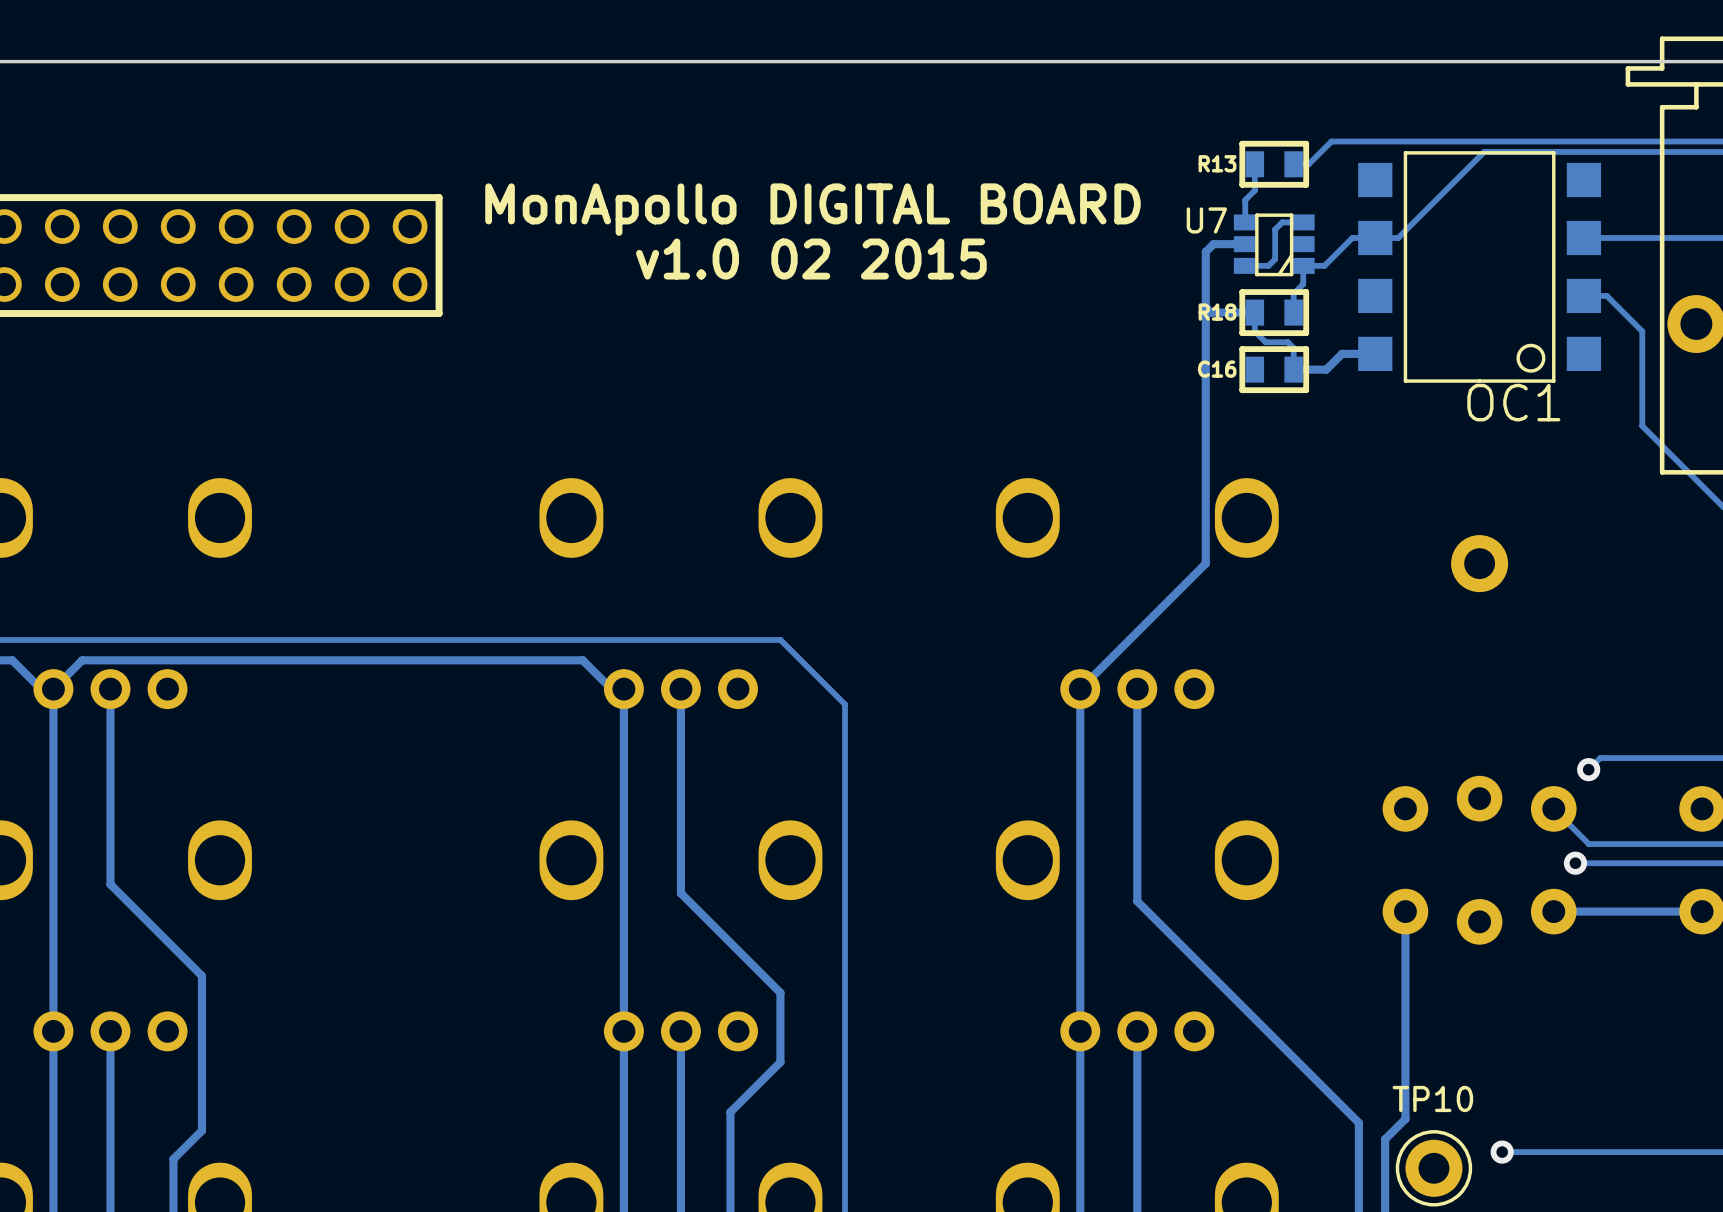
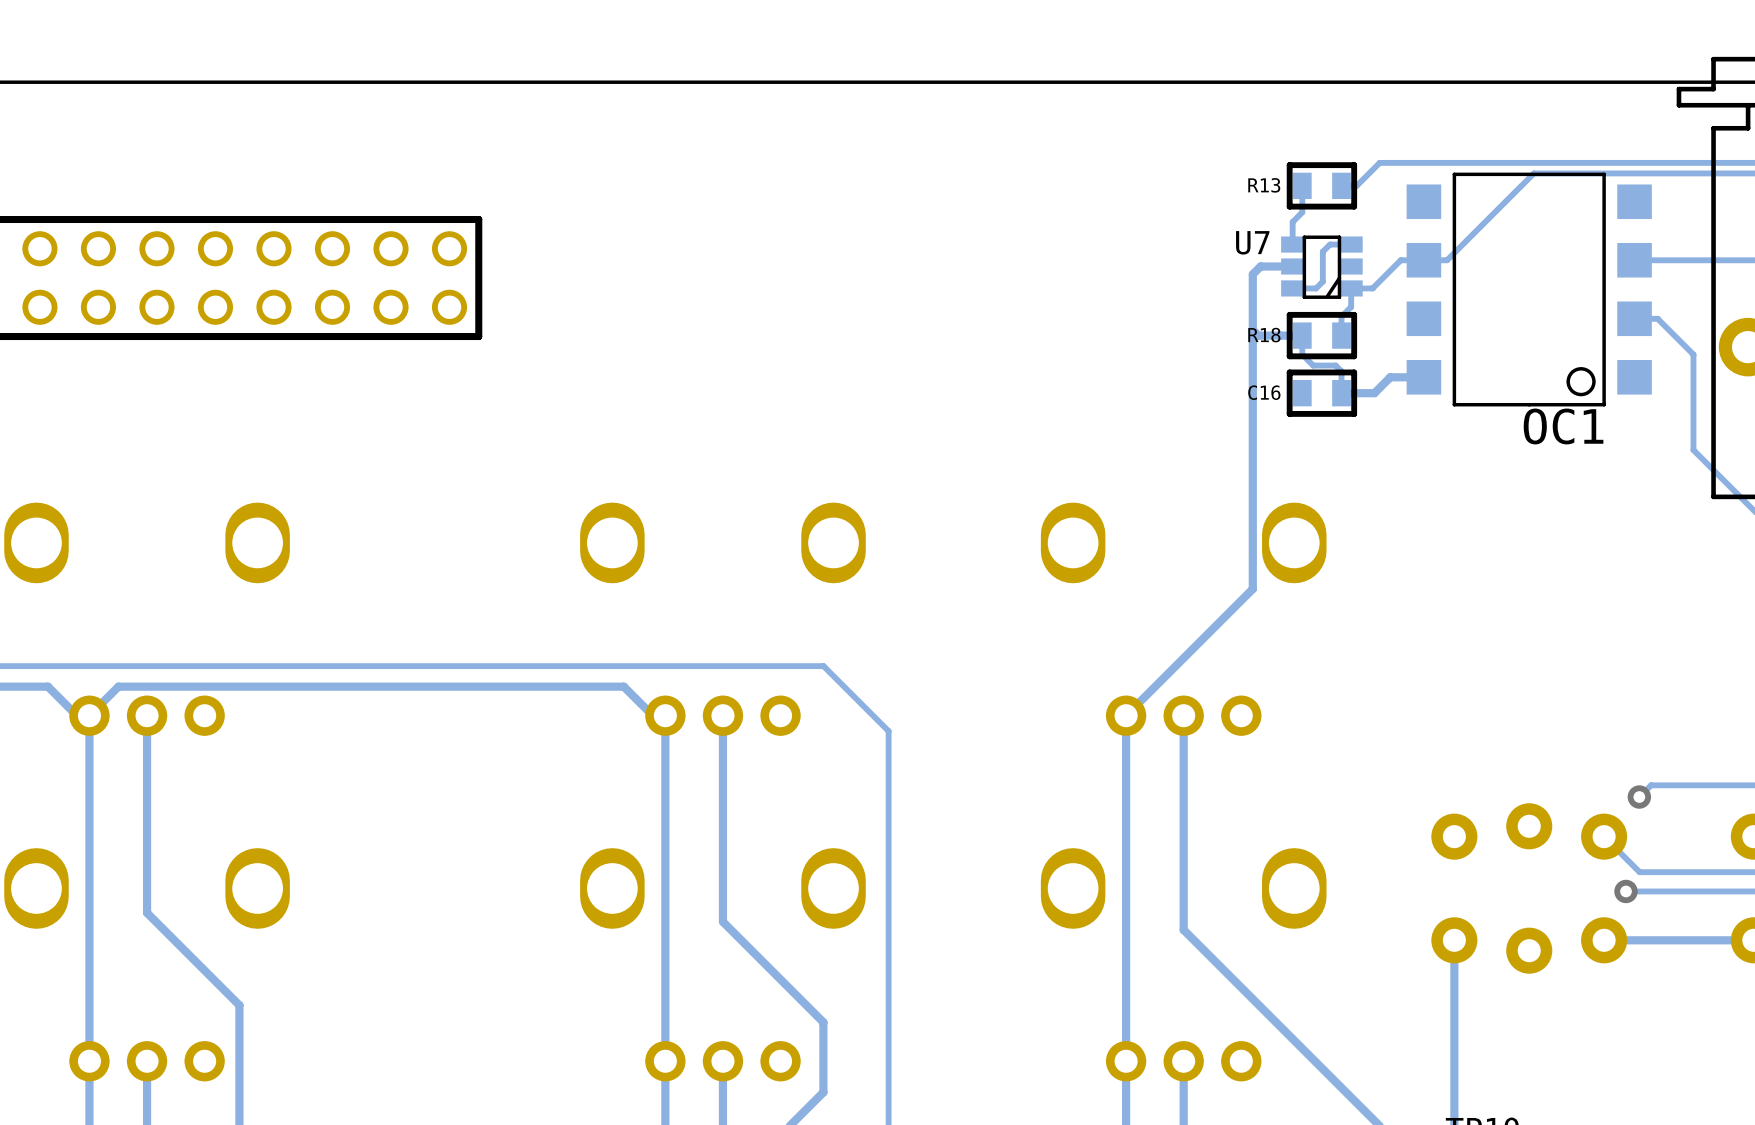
text: MonApollo DIGITAL BOARD (812, 209) -> none
text: v1.0 02 2015 (811, 259) -> none
part: (1479, 563) -> none

